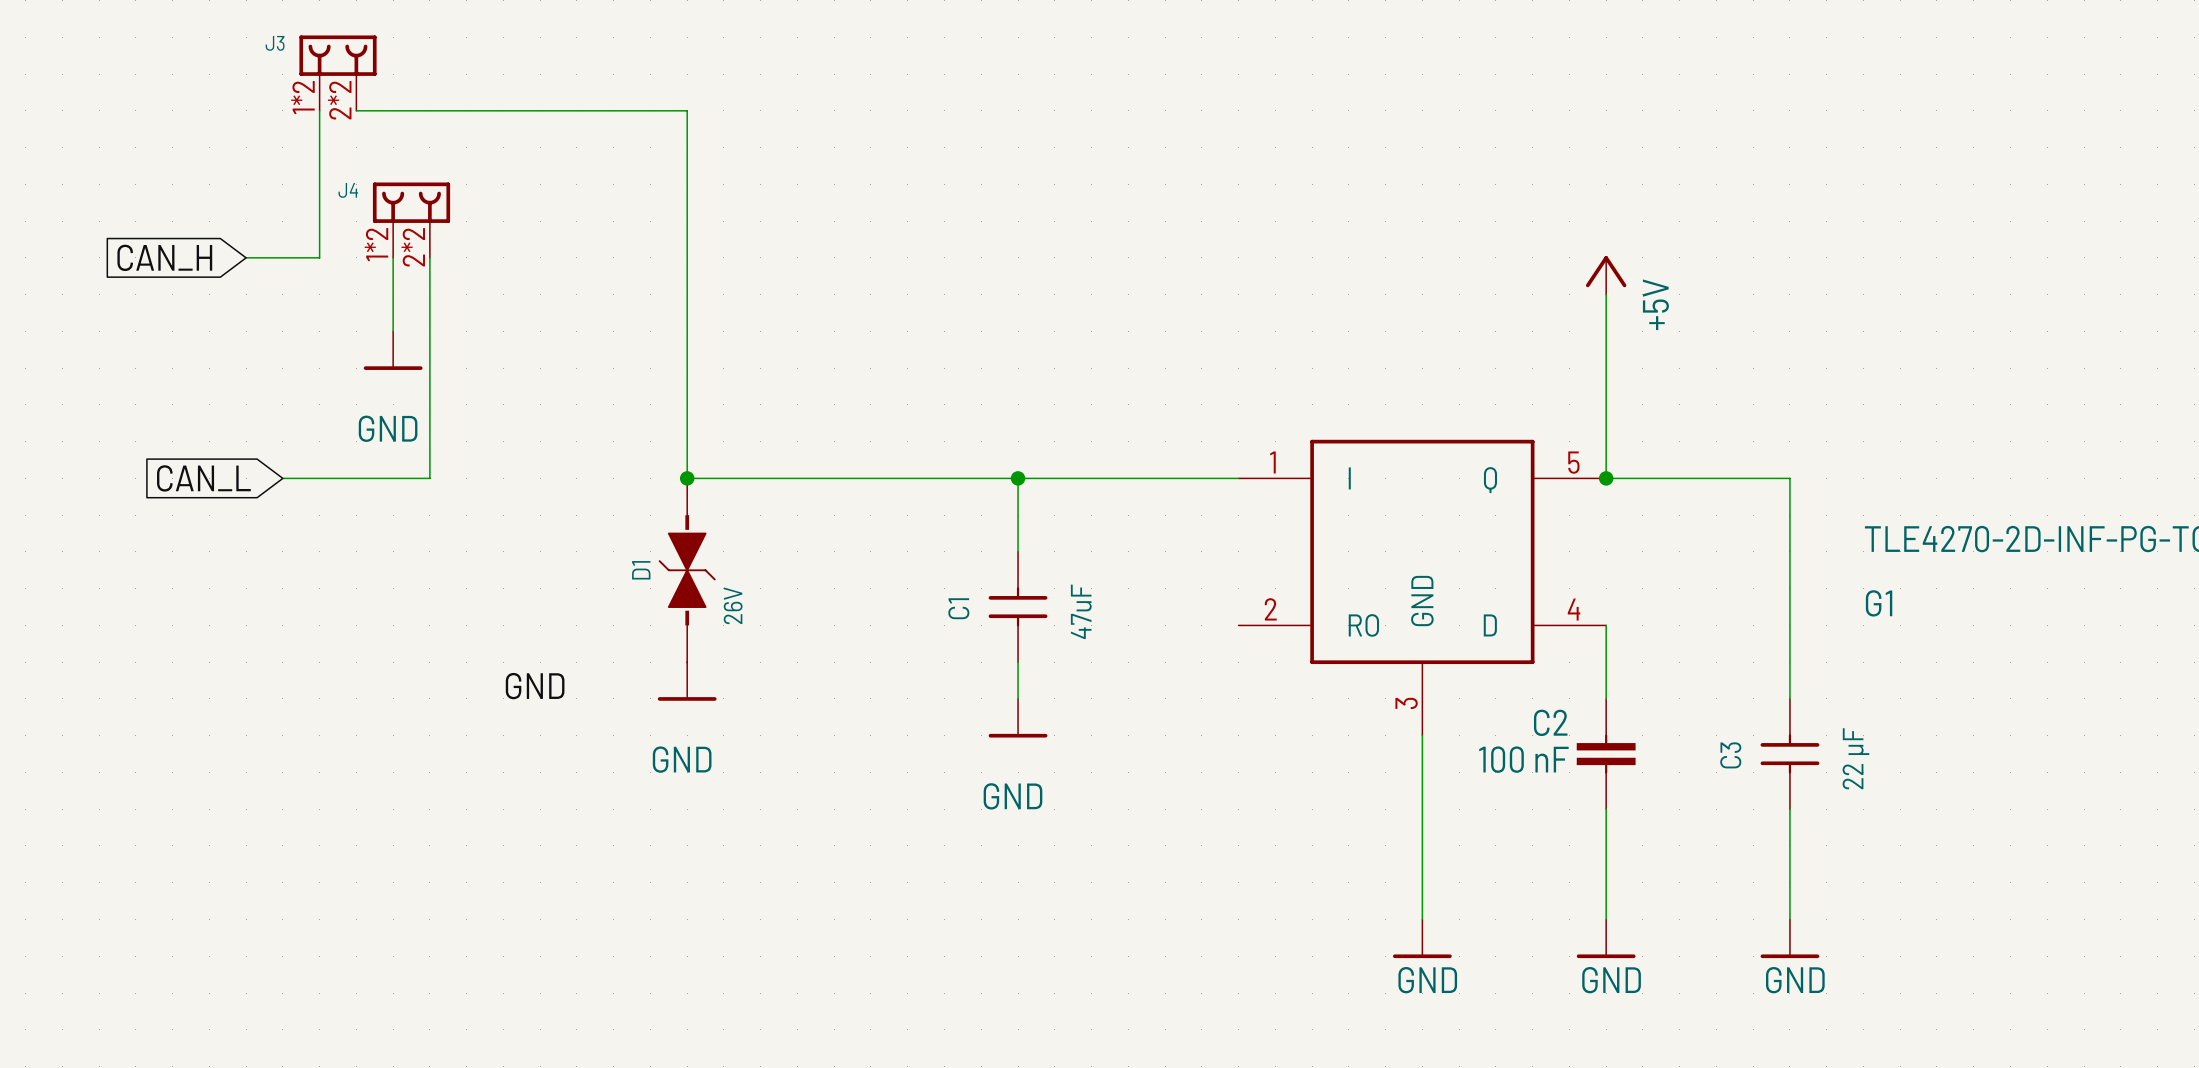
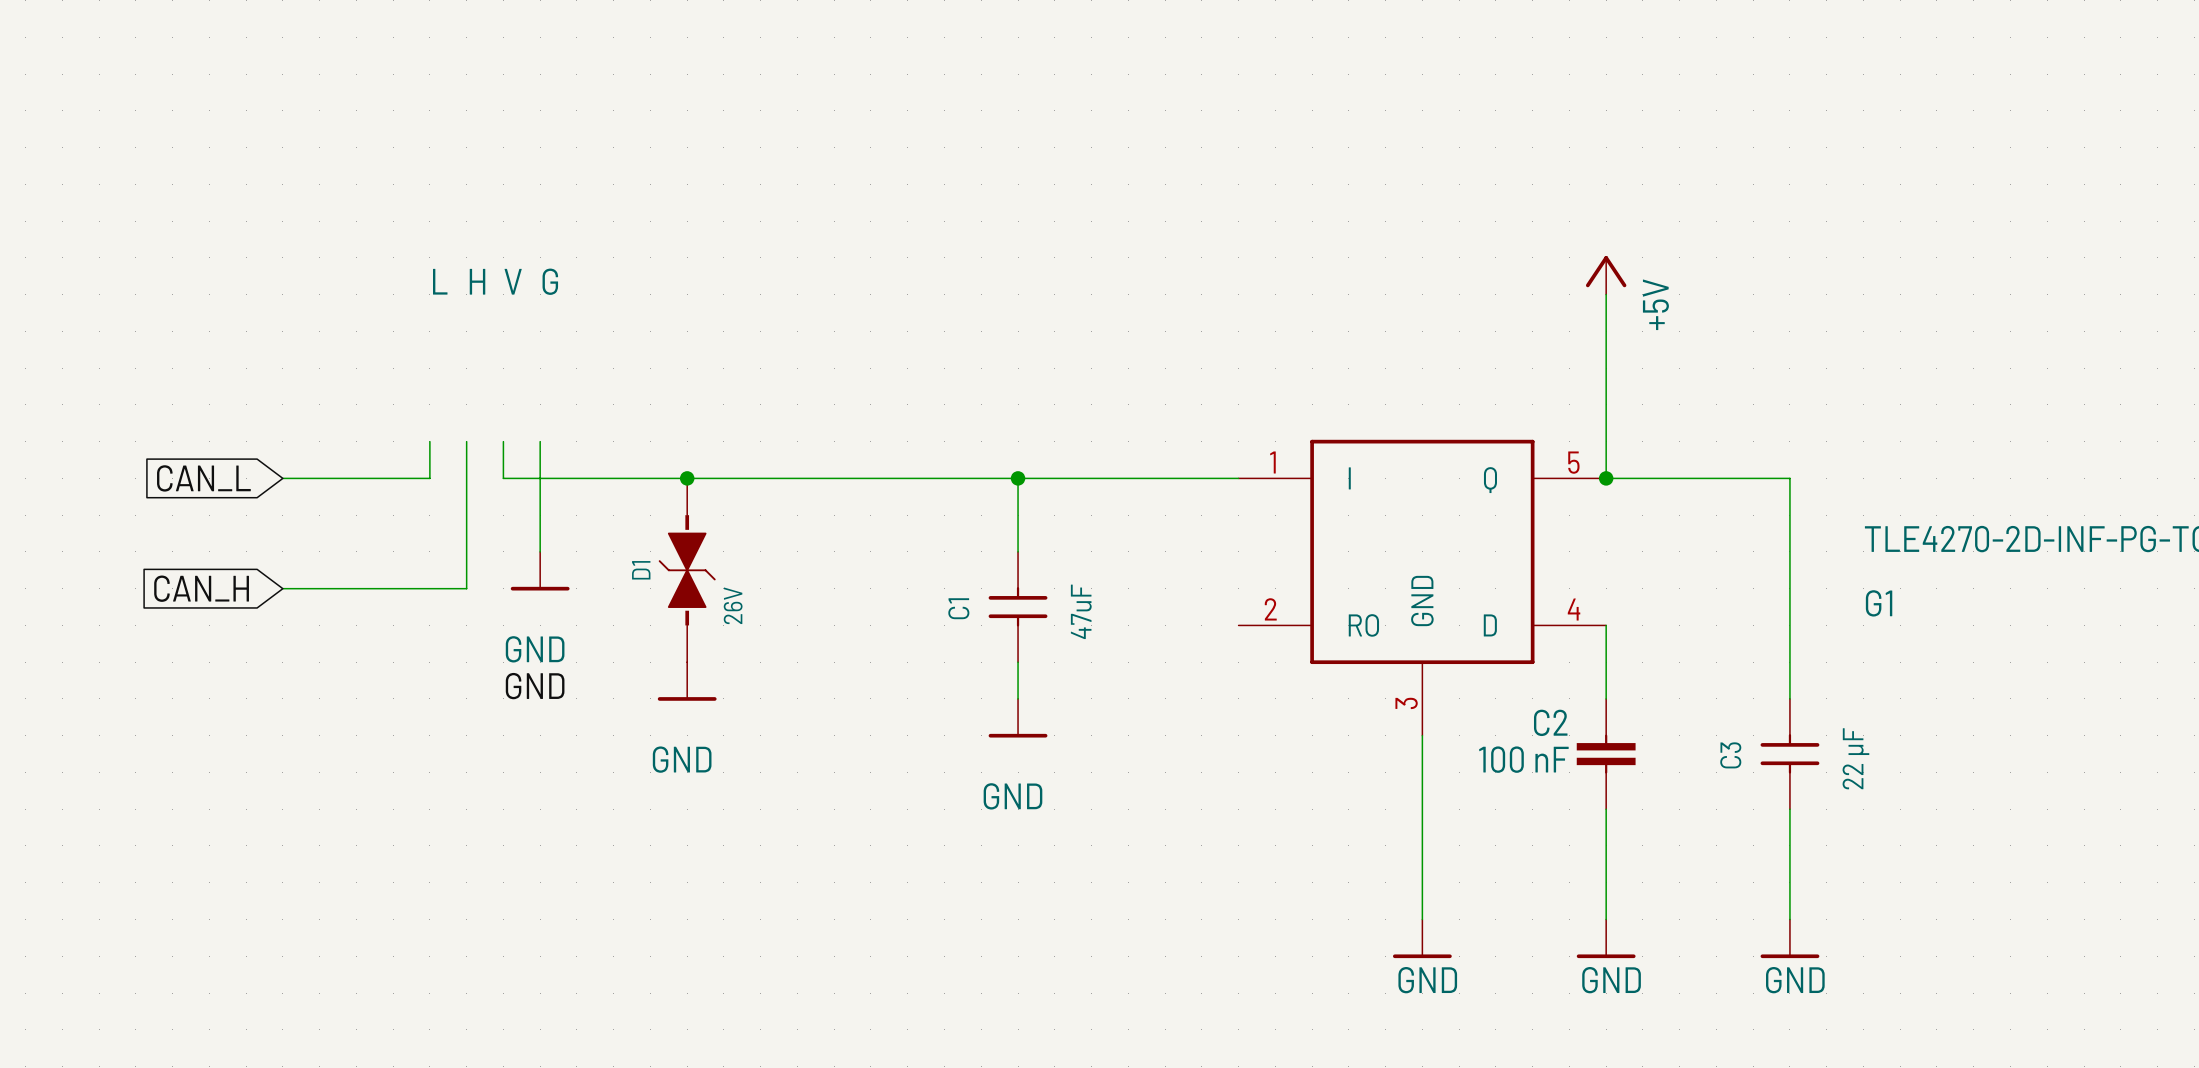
J3: (337, 73) -> none
wire: (319, 110) (319, 257) (246, 257) -> none
wire: (356, 110) (687, 110) (687, 478) -> (503, 441) (503, 478) (687, 478)
J4: (411, 220) -> none
global label position: CAN_H (164, 257) -> CAN_H (201, 588)
wire: (393, 257) (393, 331) -> none
wire: (429, 257) (429, 441) -> none
text: none -> L (440, 281)
text: none -> H (477, 281)
text: none -> V (513, 281)
text: none -> G (550, 281)
power symbol position: GND (393, 350) -> GND (540, 571)
wire: none -> (466, 441) (466, 588) (282, 588)
wire: none -> (540, 441) (540, 551)

